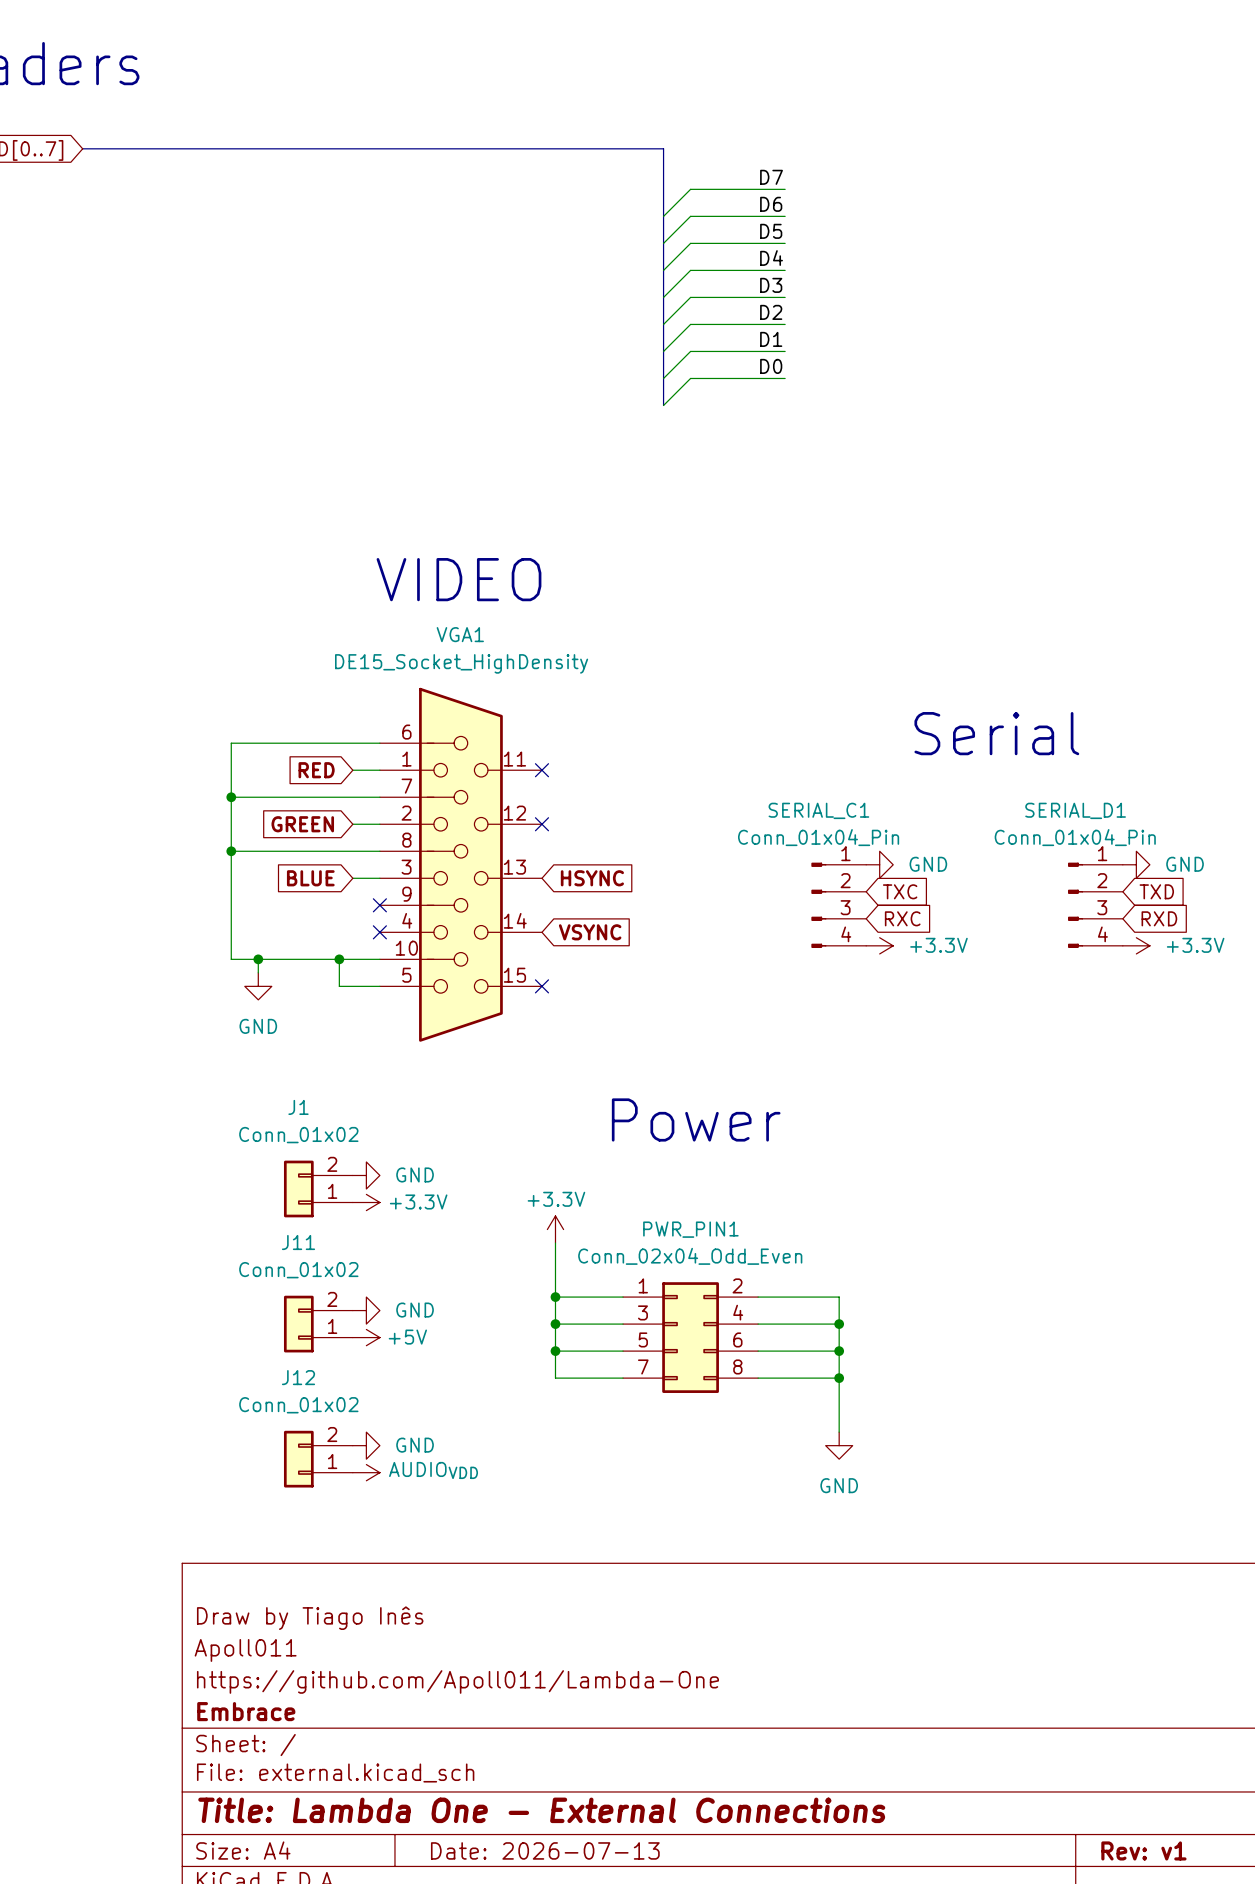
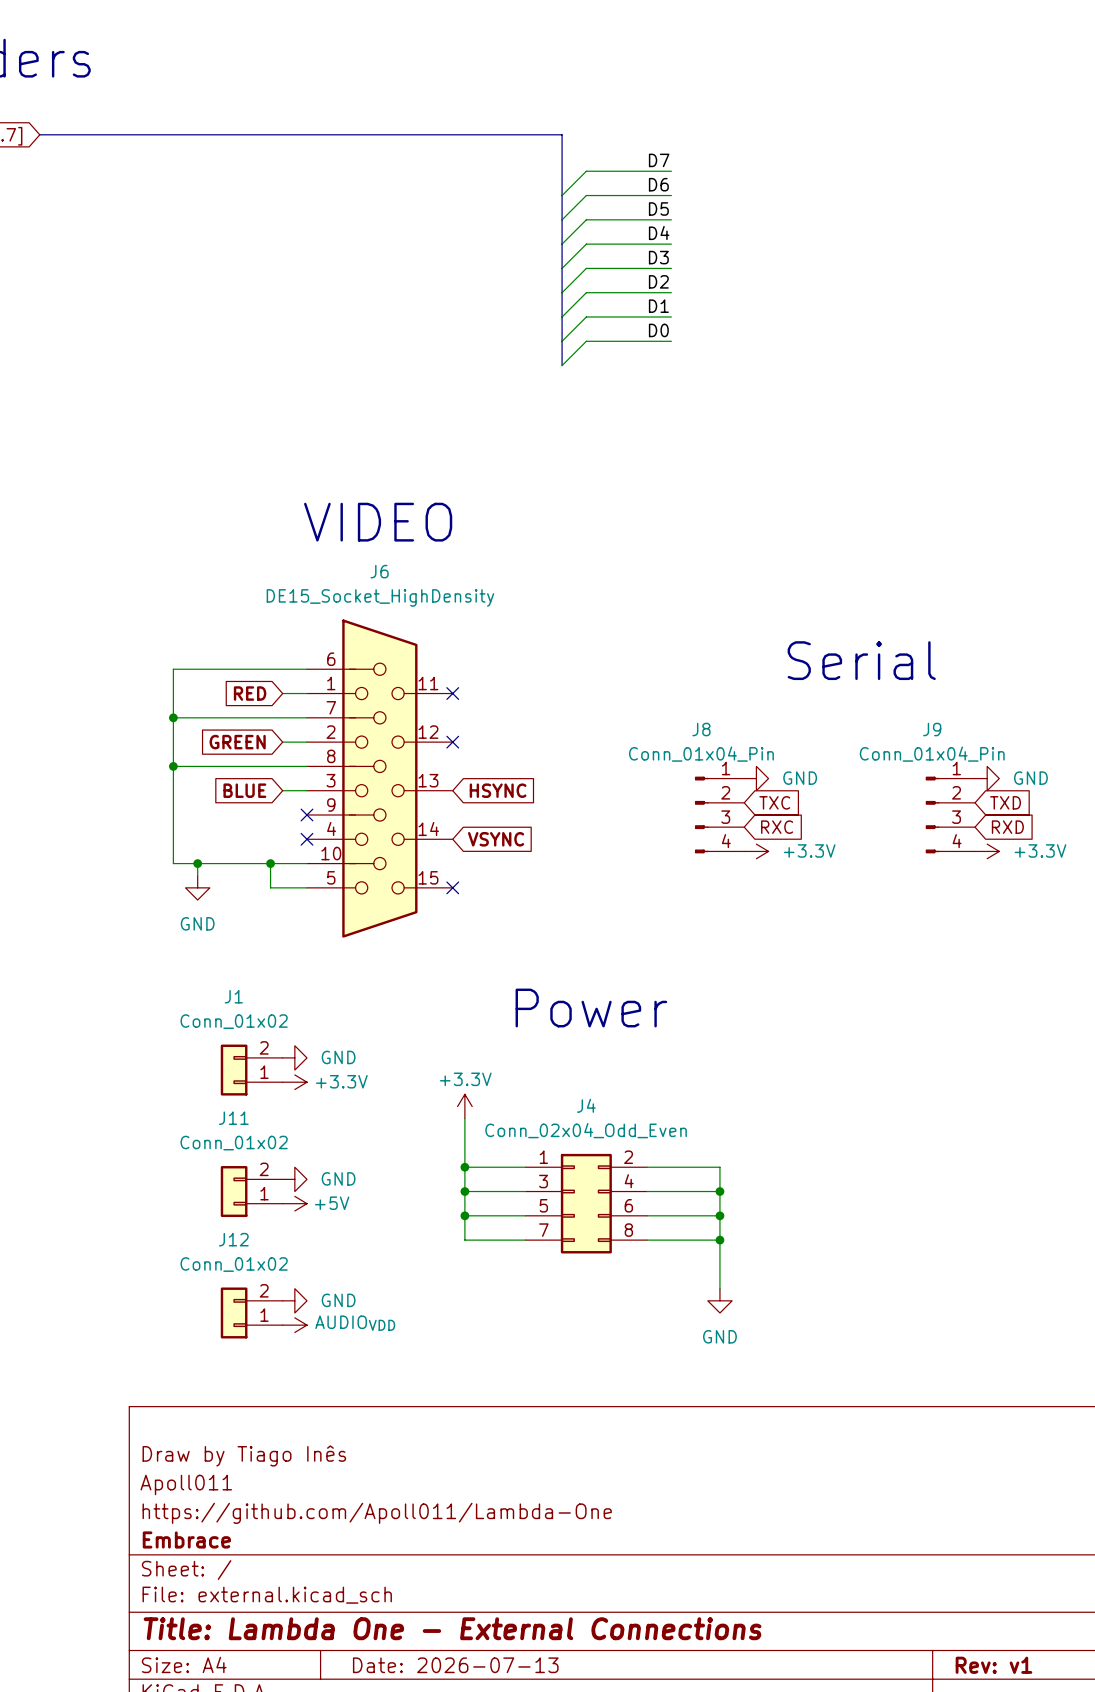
VGA1 name: VGA1 (460, 634) -> J6 (379, 571)
SERIAL_C1 name: SERIAL_C1 (818, 810) -> J8 (701, 729)
SERIAL_D1 name: SERIAL_D1 (1075, 810) -> J9 (932, 729)
PWR_PIN1 name: PWR_PIN1 (690, 1229) -> J4 (586, 1105)

